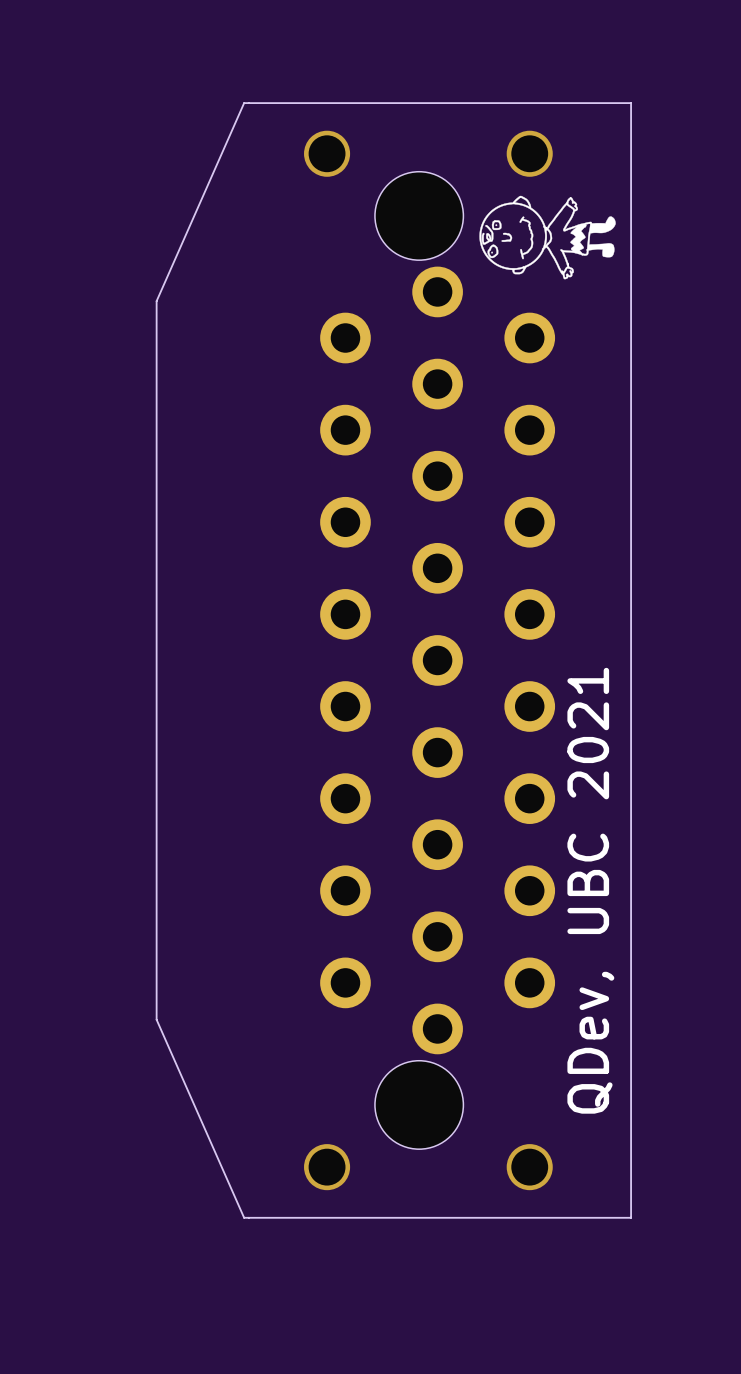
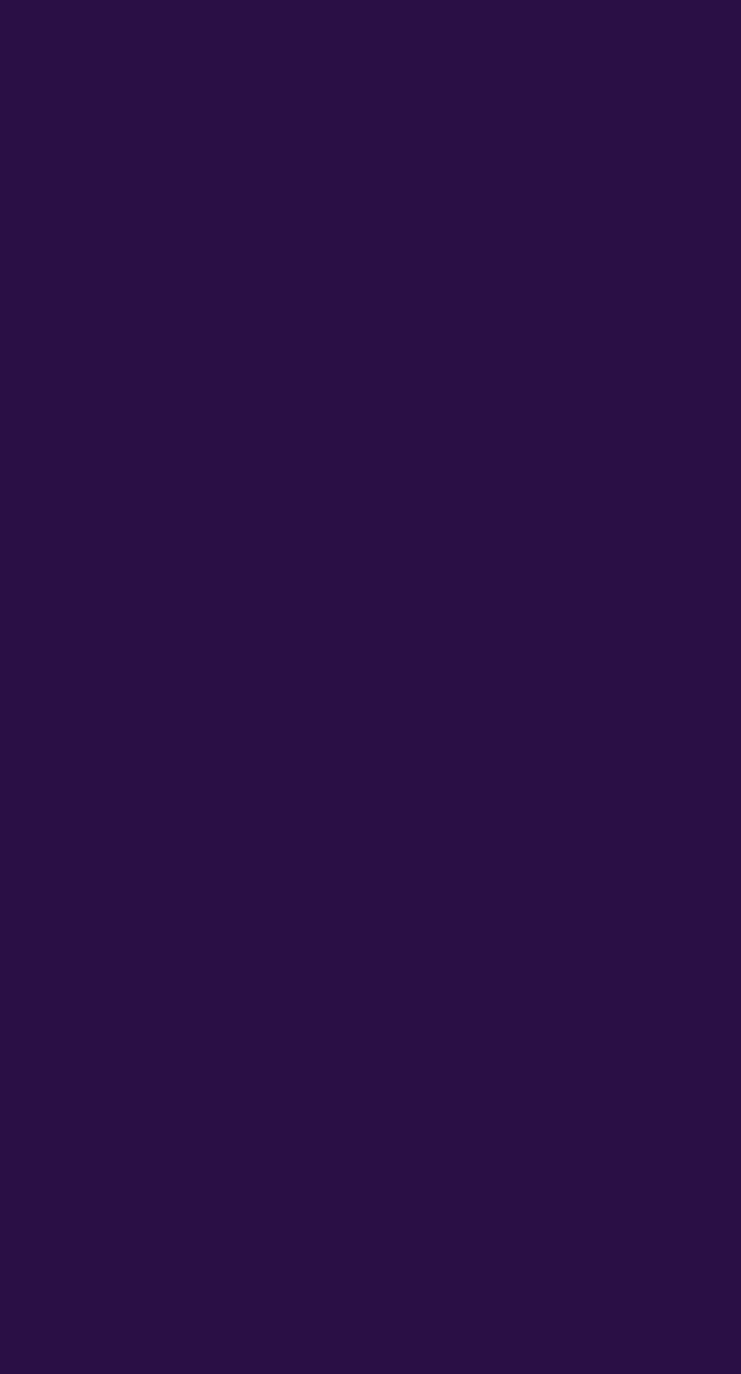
board edge: (244, 103) (156, 301) (156, 1019) (244, 1217) (631, 1217) (631, 103) (244, 103) -> none
via: (327, 153) -> none
via: (529, 153) -> none
drawing: [479, 195, 616, 280] -> none
part: (437, 660) -> none
text: QDev, UBC 2021 (590, 890) -> none
via: (327, 1167) -> none
via: (529, 1167) -> none

